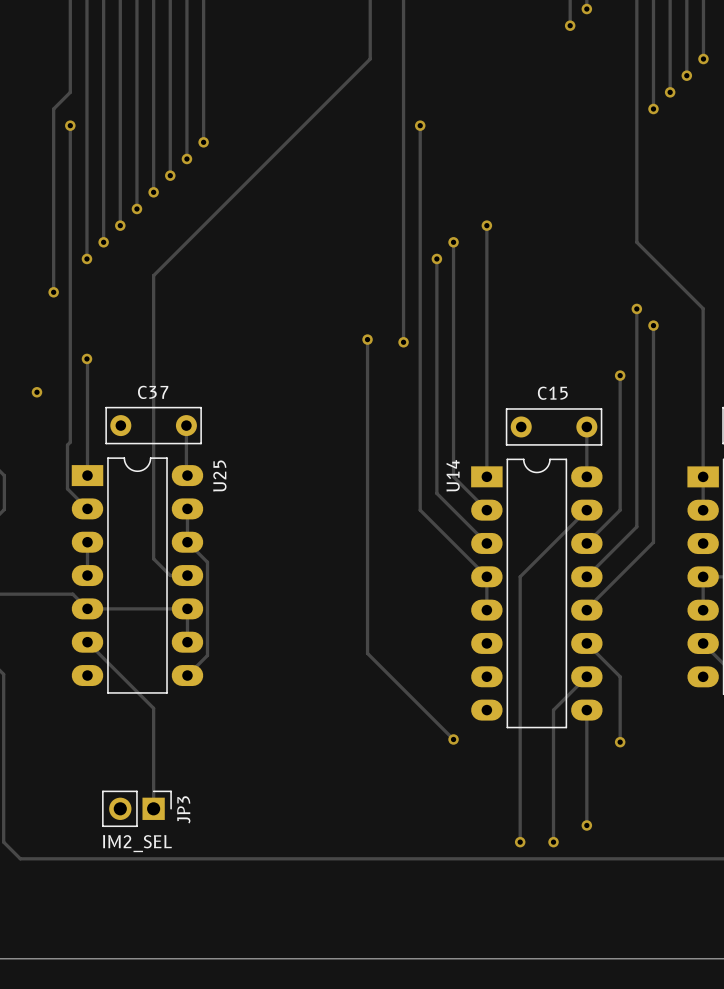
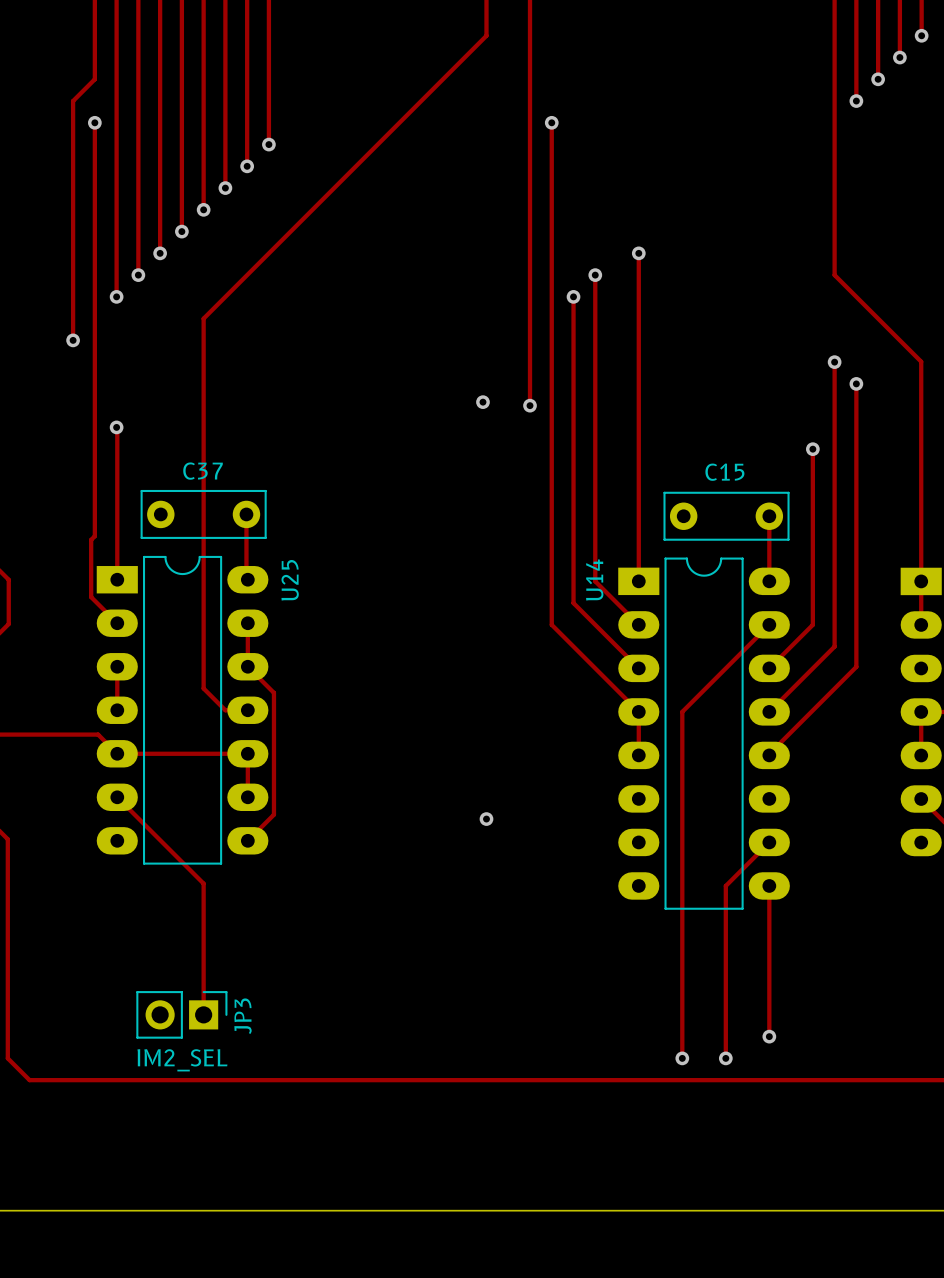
track: (367, 339) (367, 653) (453, 739) -> none
via: (36, 392) -> none
track: (586, 643) (620, 676) (620, 742) -> none
via: none -> (486, 819)
via: (453, 739) -> none
via: (620, 742) -> none

